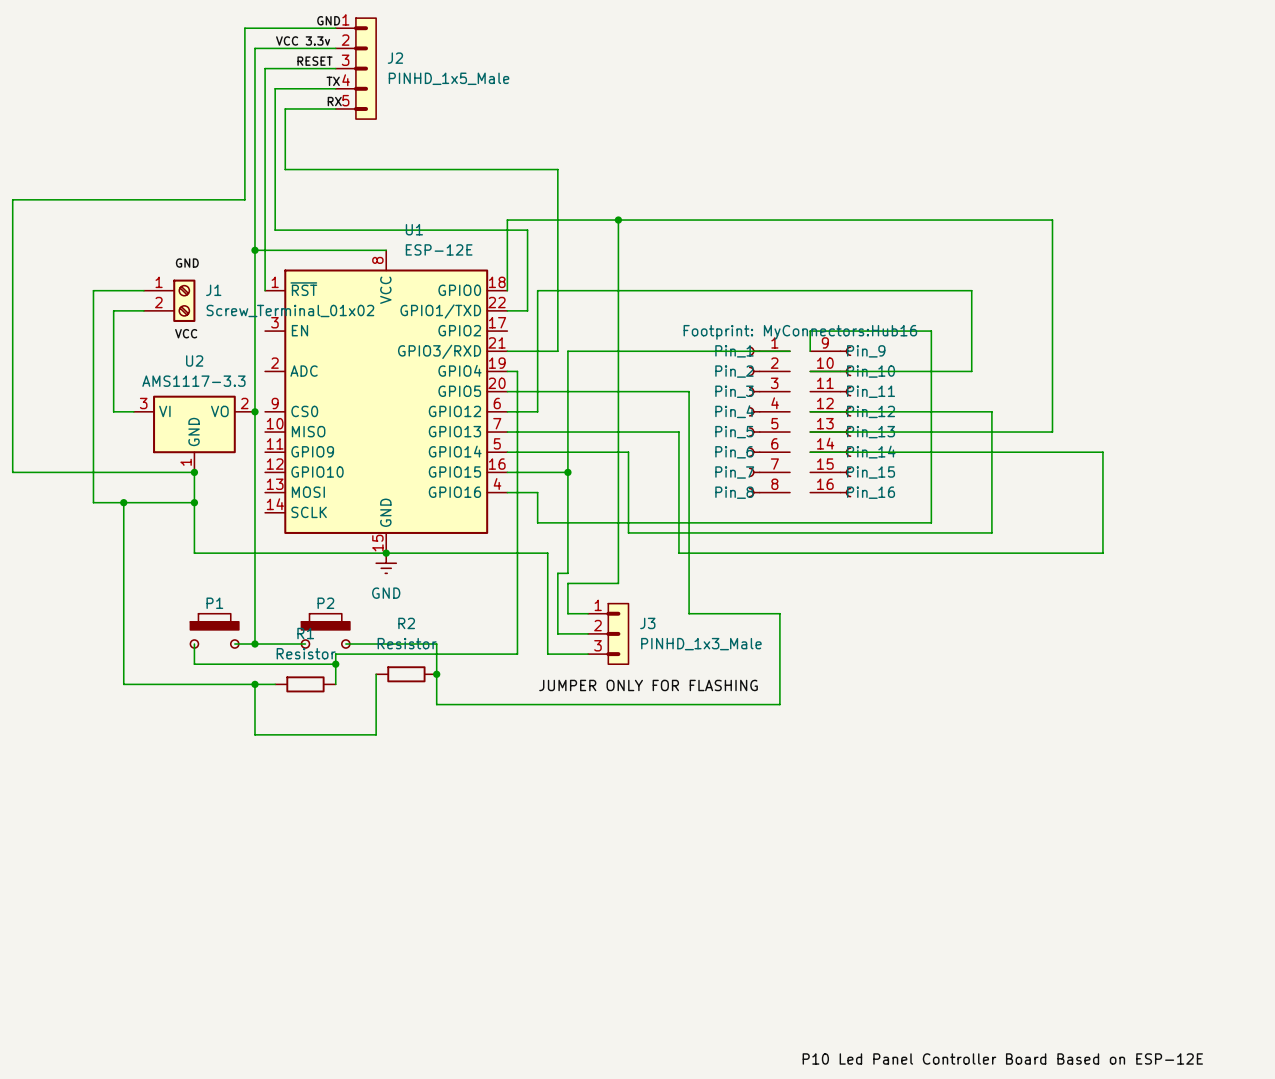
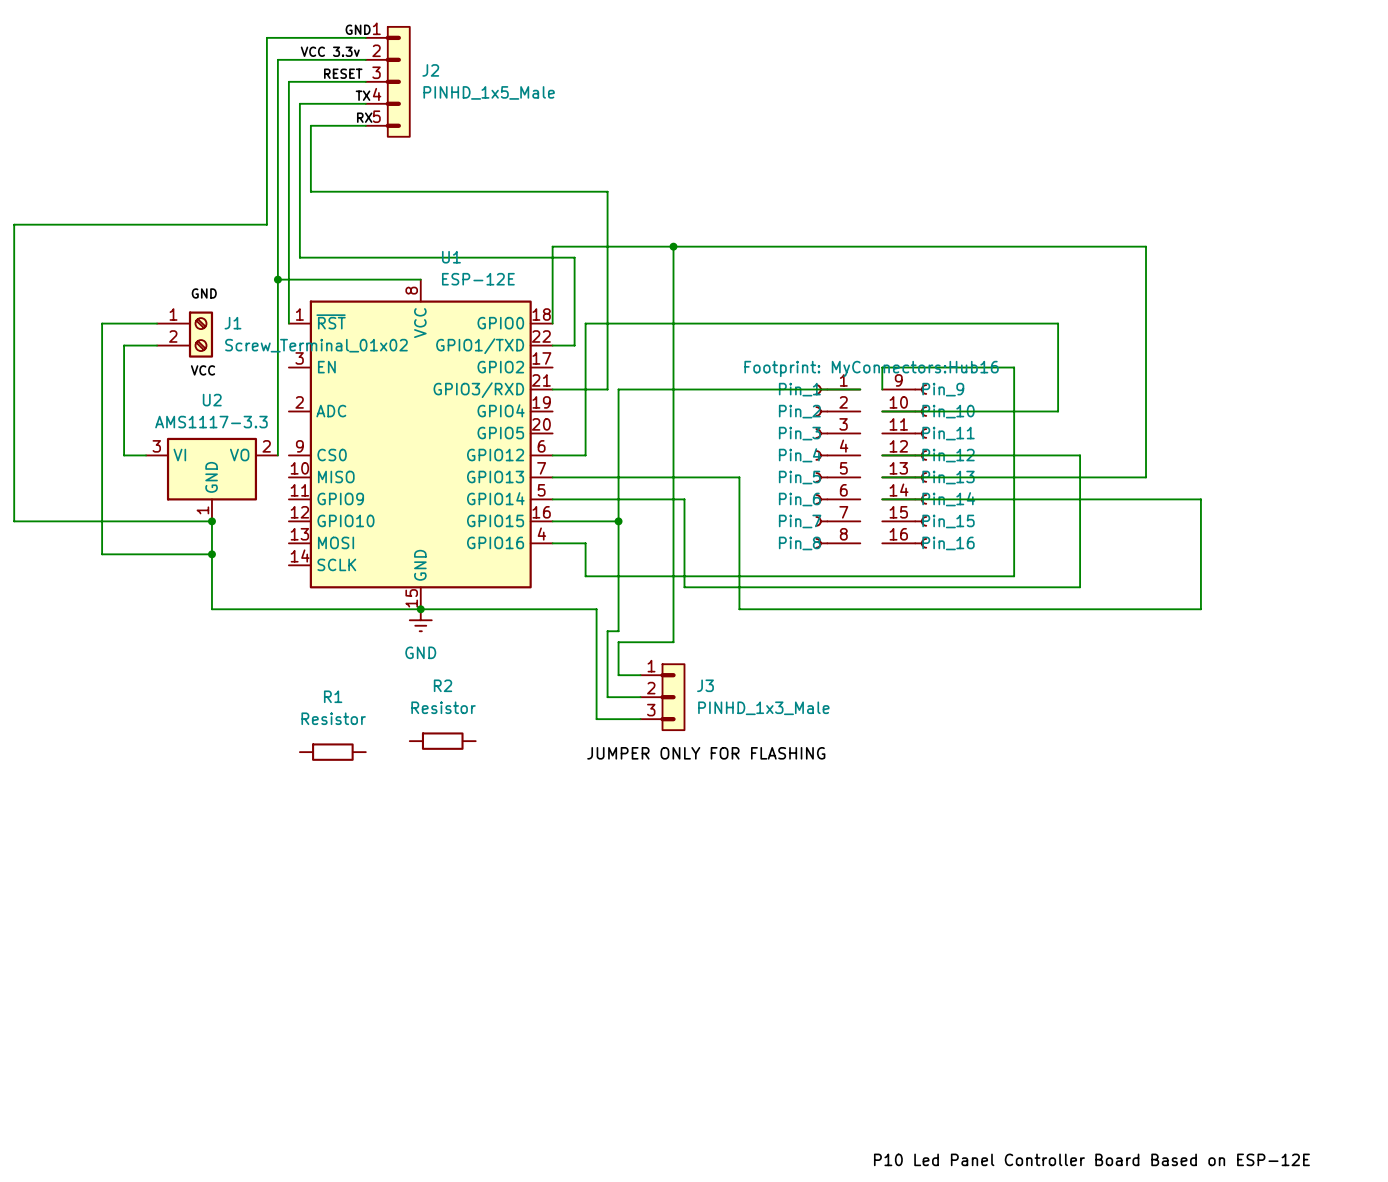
wire: (507, 371) (517, 371) (517, 654) (335, 654) (335, 684) -> none
wire: (507, 391) (689, 391) (689, 613) (779, 613) (779, 704) (436, 704) (436, 644) (345, 644) -> none
wire: (254, 411) (254, 644) -> none
junction: (254, 411) -> none
wire: (123, 502) (123, 684) (275, 684) -> none
junction: (123, 502) -> none
P1: (214, 630) -> none
P2: (325, 630) -> none
wire: (194, 644) (194, 664) (335, 664) -> none
wire: (234, 644) (305, 644) -> none
junction: (254, 644) -> none
junction: (335, 664) -> none
wire: (376, 674) (376, 734) (254, 734) (254, 684) -> none
junction: (436, 674) -> none
junction: (254, 684) -> none

